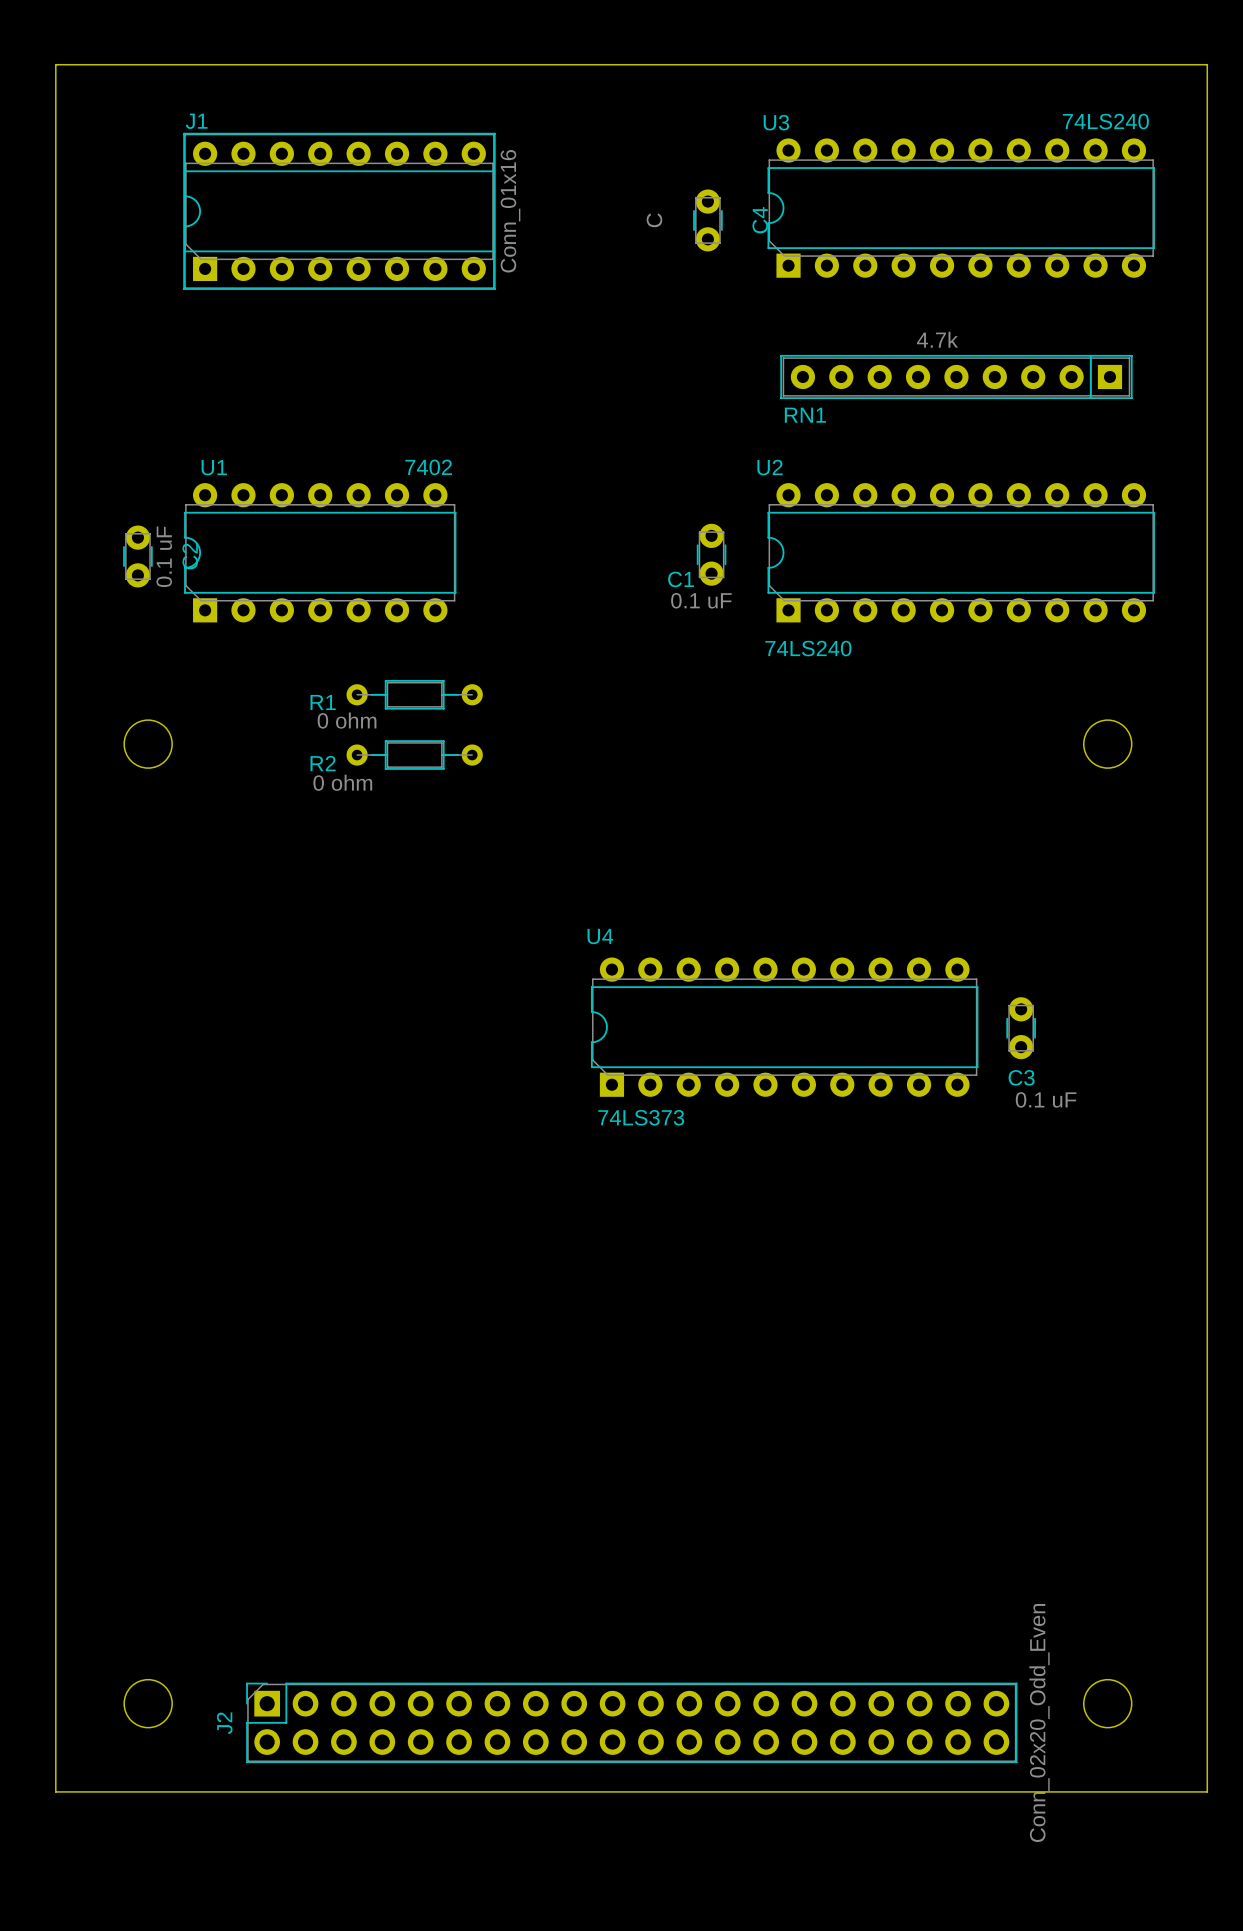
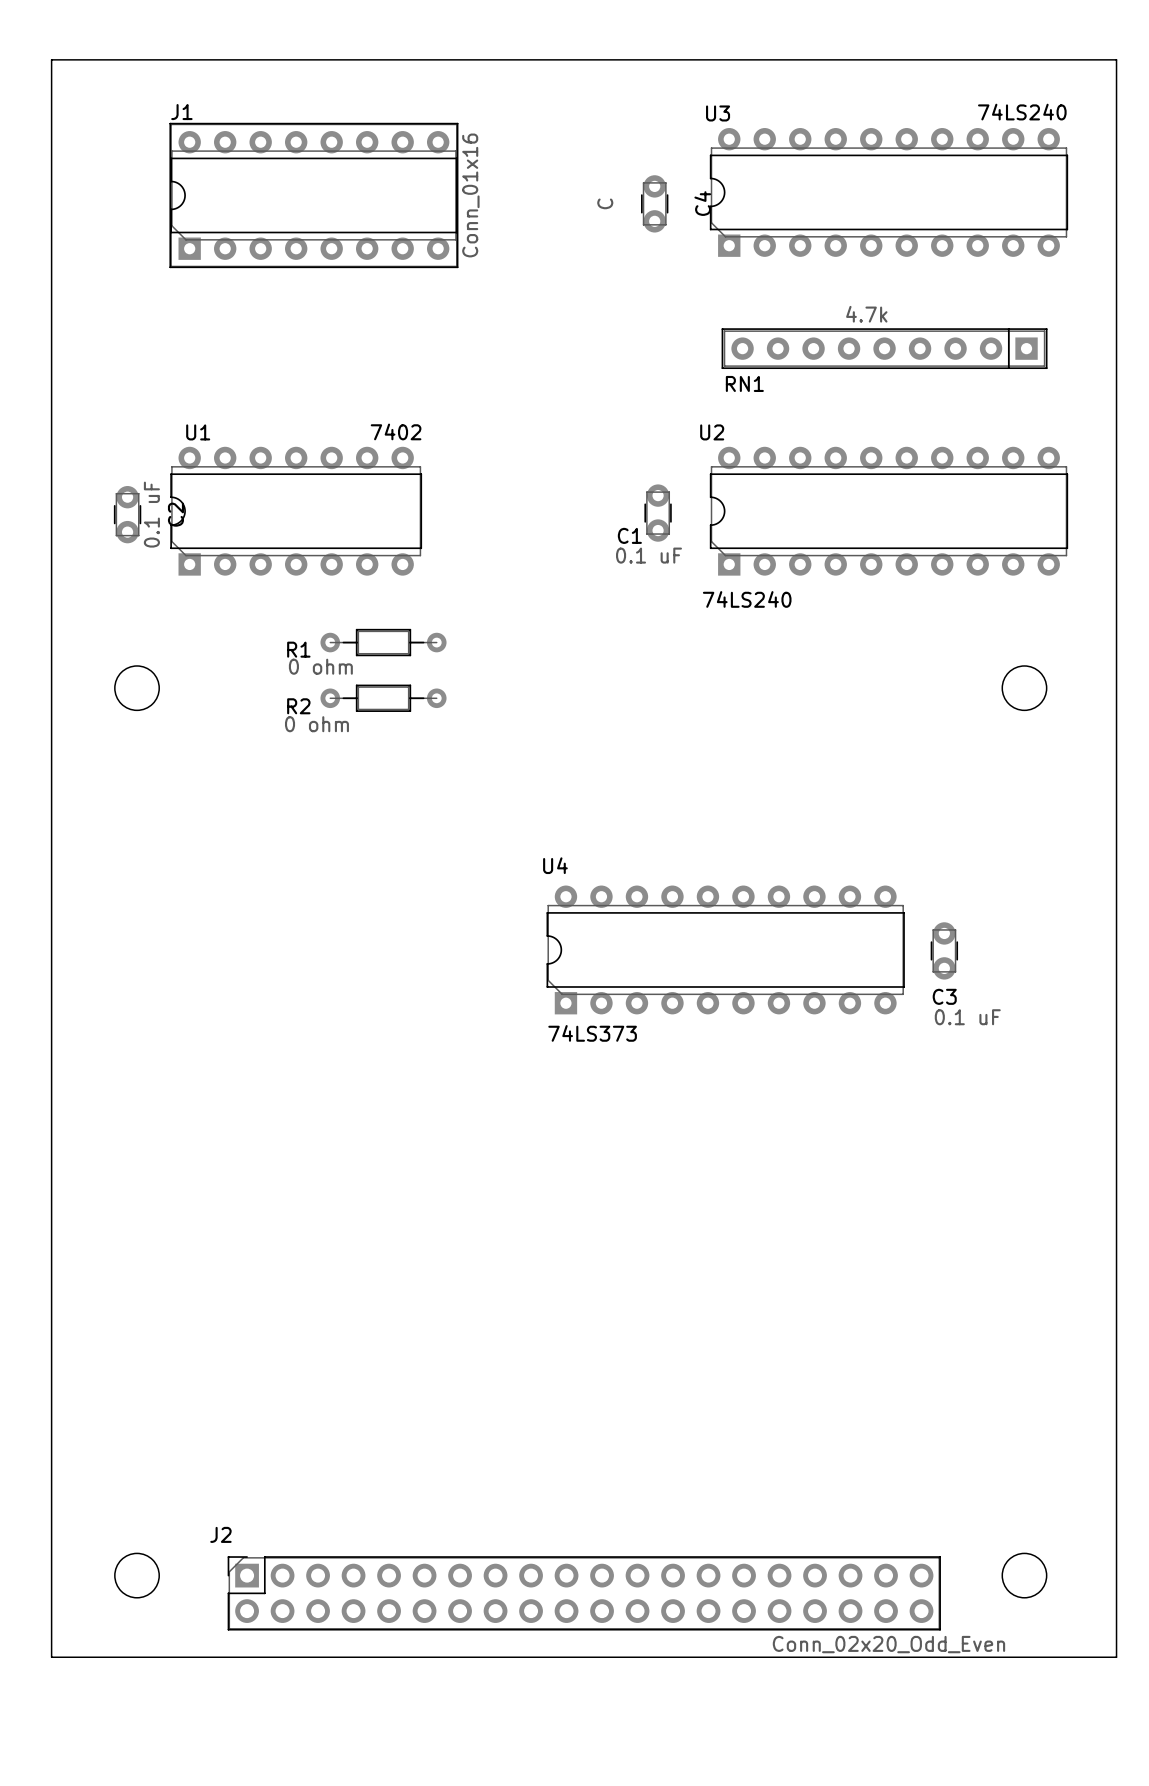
J2 name rotation: 0° (224, 1723) -> 90° clockwise (220, 1534)
J2 name position: J2 (224, 1723) -> J2 (220, 1534)
J2 value rotation: 0° (1039, 1723) -> 90° clockwise (888, 1644)

